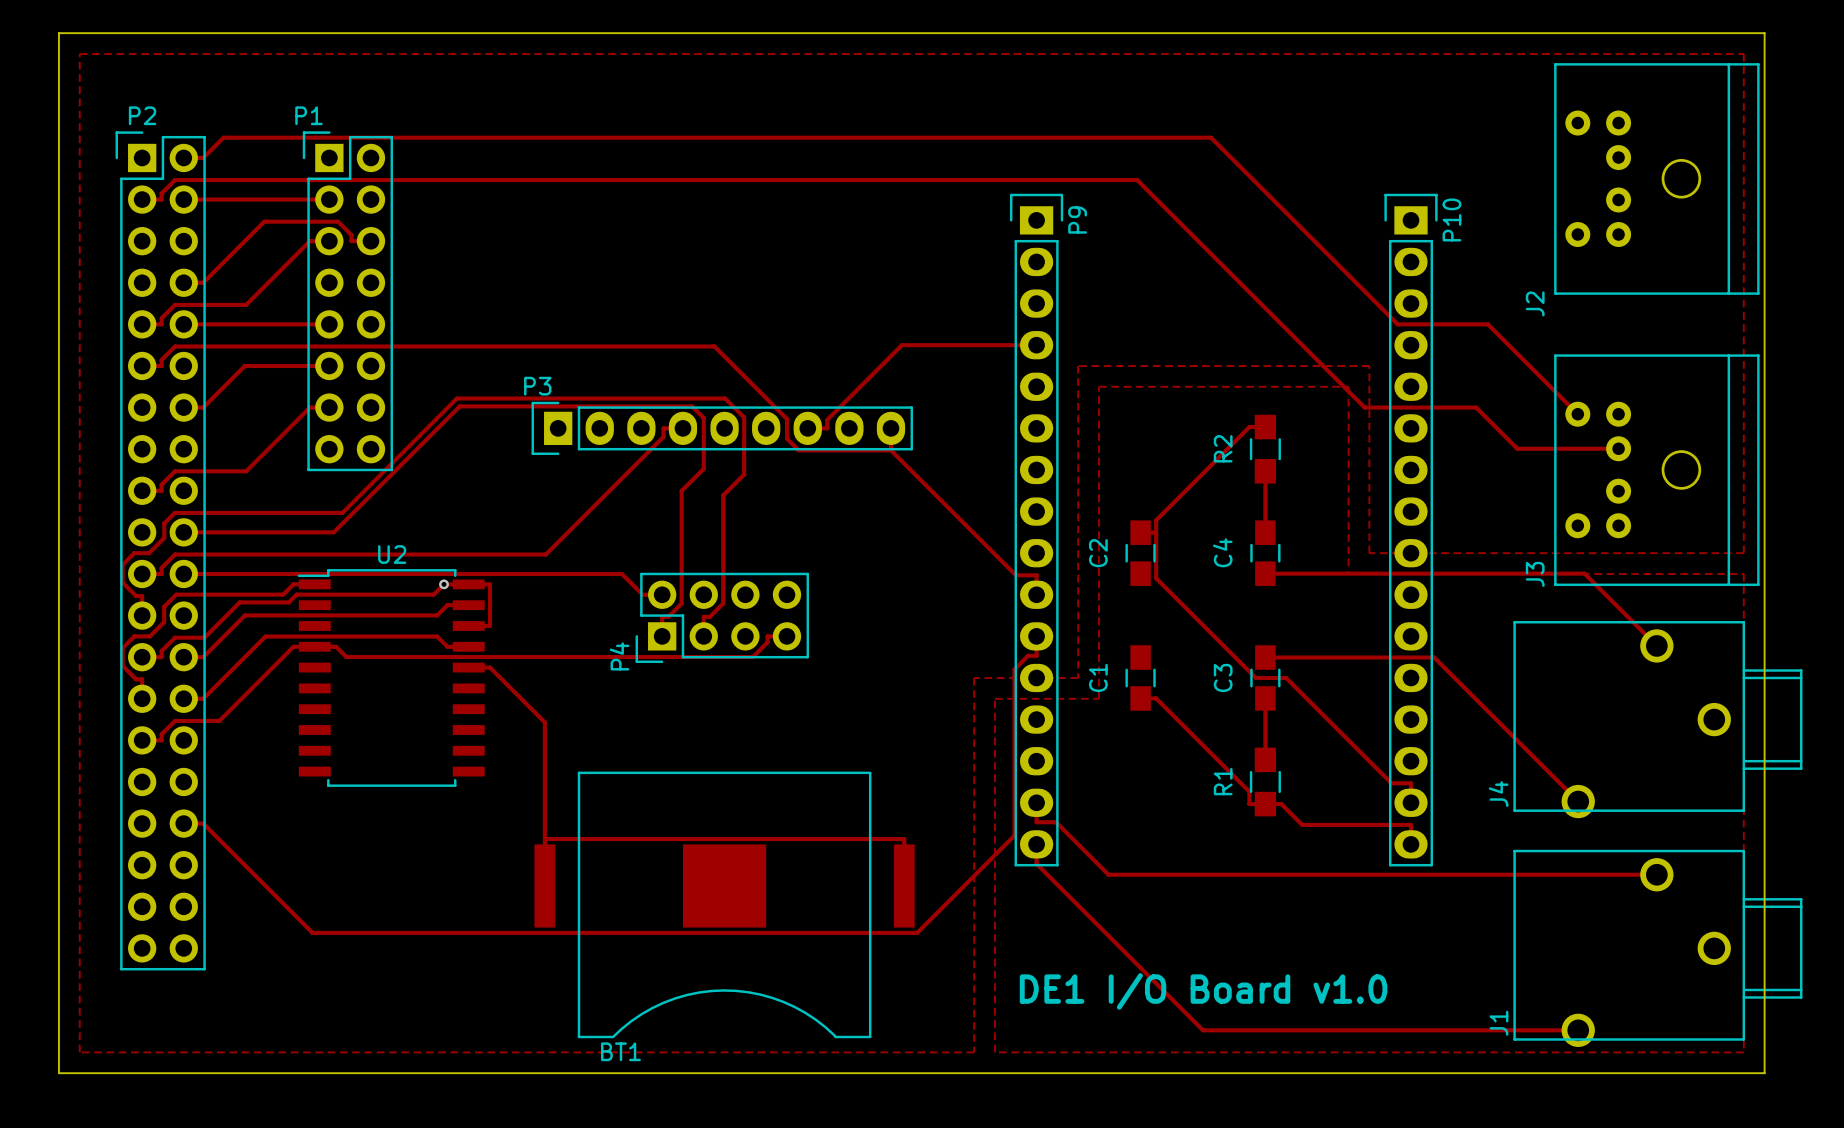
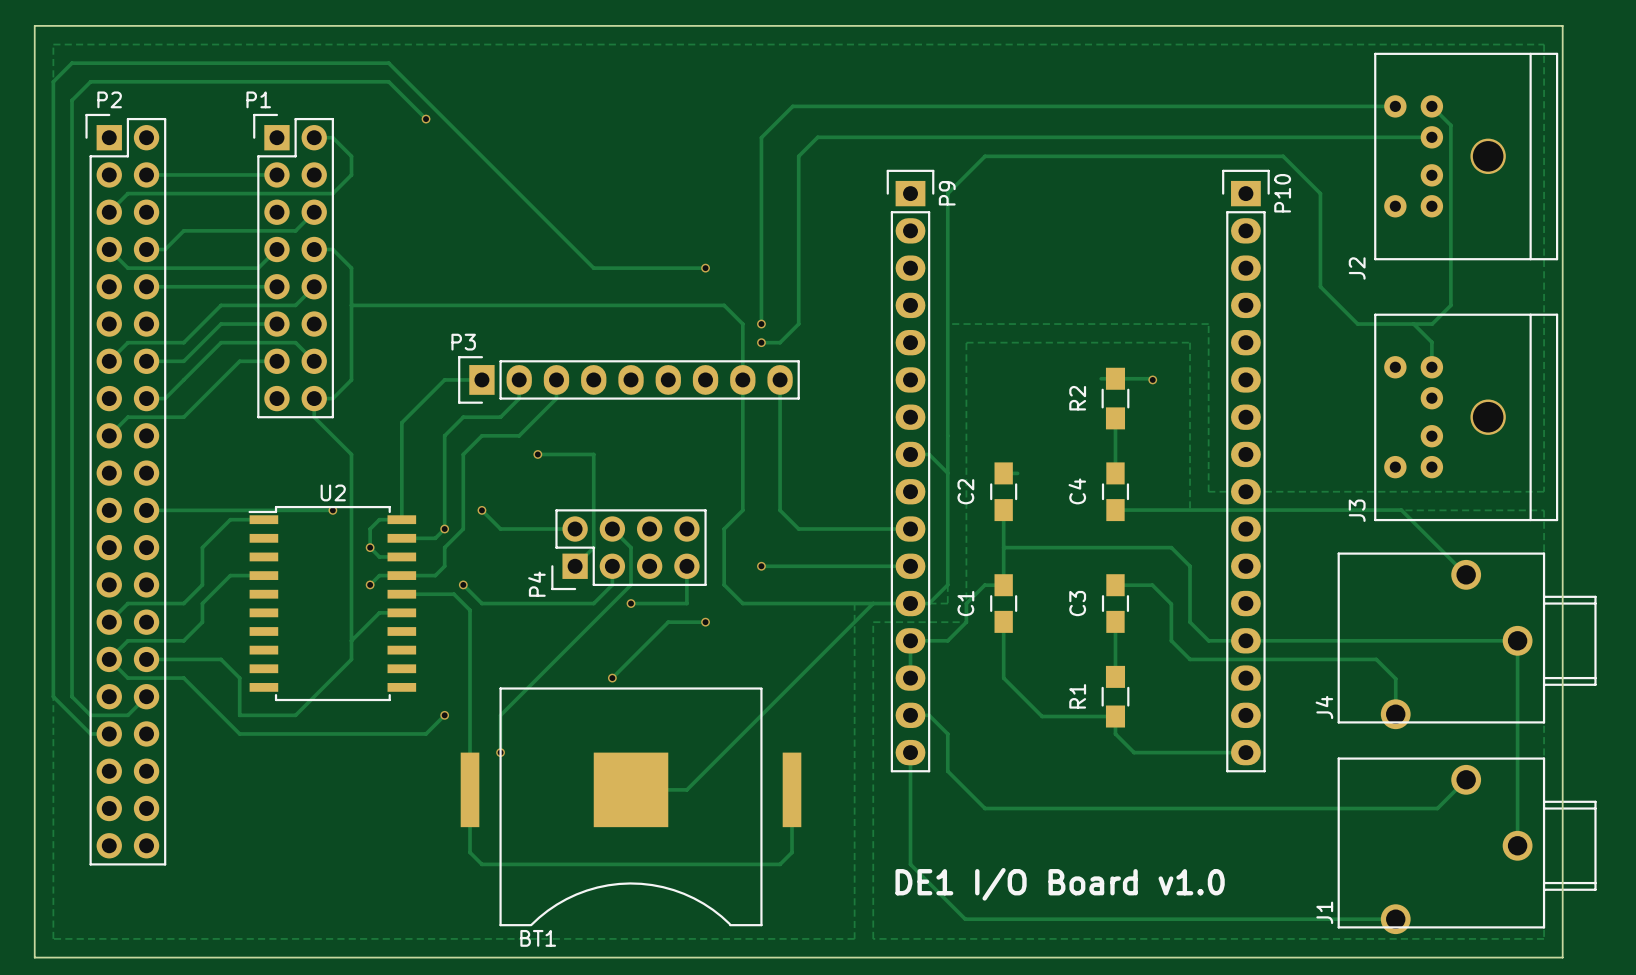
track: none -> (1395, 106) (792, 106) (761, 137) (761, 324)
track: none -> (1431, 106) (1450, 125) (1450, 305) (1432, 324) (1357, 324) (1320, 286) (1320, 193) (1283, 156) (985, 156) (947, 193) (947, 584) (929, 603) (742, 603) (724, 584) (724, 529) (742, 510) (742, 324) (724, 305) (351, 305)
track: none -> (426, 119) (388, 81) (90, 81) (72, 100) (72, 696) (90, 715) (127, 715) (146, 696)
via: none -> (426, 119)
track: (183, 157) (203, 157) (223, 137) (1211, 137) (1397, 324) (1487, 324) (1577, 414) -> none
track: none -> (314, 137) (332, 137) (351, 156) (351, 174) (332, 193) (127, 193) (109, 212)
track: none -> (1431, 137) (817, 137) (798, 156) (798, 324) (780, 342) (761, 342)
track: (142, 199) (161, 199) (161, 193) (175, 180) (1137, 180) (1364, 407) (1476, 407) (1517, 448) (1618, 448) -> none
track: (329, 241) (309, 241) (246, 304) (175, 304) (161, 318) (161, 324) (142, 324) -> none
track: (370, 241) (351, 241) (351, 235) (338, 221) (264, 221) (203, 282) -> (314, 212) (295, 230) (183, 230) (163, 249)
track: none -> (109, 249) (127, 268) (258, 268) (276, 249)
track: none -> (314, 249) (332, 249) (351, 268) (351, 379) (332, 398) (314, 398) (314, 417) (351, 454) (351, 659) (295, 715) (239, 715) (239, 678) (221, 659) (146, 659)
track: none -> (705, 268) (593, 268) (388, 63) (72, 63) (53, 81) (53, 696) (90, 733) (109, 733)
via: none -> (705, 268)
track: none -> (314, 286) (295, 305) (221, 305) (183, 342) (127, 342) (109, 361)
track: (1036, 345) (901, 345) (827, 419) (827, 428) (807, 428) -> none
track: (142, 365) (161, 365) (161, 359) (175, 346) (714, 346) (786, 419) (786, 438) (798, 450) (890, 450) (1015, 575) (1036, 575) (1036, 594) -> (780, 399) (780, 510) (798, 529) (910, 529)
track: (266, 365) (244, 365) (203, 407) -> (221, 324) (183, 361) (163, 361)
via: none -> (761, 324)
track: none -> (1413, 324) (1431, 342) (1431, 367)
via: none -> (761, 342)
track: (309, 407) (246, 471) (175, 471) (161, 484) (161, 490) (142, 490) -> (259, 361) (239, 361) (183, 417) (127, 417) (109, 435)
track: none -> (314, 361) (295, 342) (221, 342) (165, 398) (146, 398)
track: (1249, 427) (1156, 520) (1156, 578) (1255, 677) (1286, 677) (1327, 719) -> (1152, 585) (1171, 604) (1171, 640)
track: none -> (1115, 378) (1152, 379)
track: none -> (481, 379) (444, 379) (401, 422) (401, 519)
track: none -> (556, 379) (556, 398) (519, 435) (481, 435) (463, 454) (463, 529) (444, 547) (444, 566) (435, 575) (401, 575)
track: (682, 428) (663, 428) (663, 436) (545, 554) (175, 554) (161, 567) (161, 573) (142, 573) -> none
via: none -> (1152, 379)
via: none -> (537, 454)
track: none -> (910, 454) (929, 454) (947, 473)
track: (183, 532) (333, 532) (459, 406) (692, 406) (703, 418) (703, 468) (681, 490) (681, 603) (668, 616) (662, 616) (662, 636) -> (537, 454) (593, 454) (593, 547) (575, 566)
track: (391, 573) (621, 573) (642, 594) -> (481, 510) (500, 529) (557, 529)
via: none -> (332, 510)
via: none -> (481, 510)
track: none -> (1003, 510) (1003, 585) (984, 585) (966, 603) (966, 622) (947, 640) (910, 640) (910, 678)
track: (293, 584) (283, 594) (176, 594) (164, 606) (164, 622) (149, 636) (134, 636) (122, 648) (122, 665) (136, 679) (142, 679) (142, 698) -> (244, 519) (230, 519) (202, 547) (202, 584) (183, 603) (127, 603) (109, 622)
track: (444, 584) (433, 594) (296, 594) (288, 602) (239, 602) (204, 637) (175, 637) (161, 651) (161, 657) (142, 657) -> none
via: (444, 584) -> none
track: (468, 584) (490, 584) (490, 625) (468, 625) -> (379, 519) (370, 529) (370, 547) (379, 556) (401, 556)
via: none -> (444, 529)
track: none -> (612, 529) (631, 547) (631, 584) (500, 715) (500, 752)
track: (468, 605) (447, 605) (437, 615) (244, 615) (203, 657) (183, 657) -> (401, 538) (435, 538) (444, 529) (444, 435) (463, 417) (500, 417) (519, 398) (519, 379)
track: (142, 615) (142, 596) (136, 596) (122, 582) (122, 564) (134, 553) (149, 553) (164, 537) (164, 523) (174, 512) (342, 512) (456, 398) (725, 398) (744, 417) (744, 474) (723, 495) (723, 603) (709, 616) (703, 616) (703, 636) -> (463, 584) (481, 603) (593, 603) (612, 584) (612, 566)
via: none -> (370, 547)
track: none -> (1003, 547) (1171, 547) (1190, 566) (1190, 622) (1208, 640) (1517, 640) (1517, 845)
track: (786, 636) (767, 636) (767, 642) (752, 657) (346, 657) (336, 646) (314, 646) -> (686, 566) (686, 603) (631, 603)
via: none -> (761, 566)
track: (1036, 636) (1036, 655) (1028, 655) (1014, 669) (1014, 835) (917, 932) (312, 932) (203, 823) (183, 823) -> (910, 566) (761, 566)
track: (293, 646) (219, 720) (175, 720) (161, 734) (161, 740) (142, 740) -> (244, 575) (230, 575) (202, 603) (202, 622) (183, 640) (127, 640) (109, 659) (127, 678) (183, 678) (239, 733) (426, 733) (444, 715)
track: (447, 646) (437, 636) (265, 636) (203, 698) (183, 698) -> (382, 575) (379, 575) (370, 584)
via: none -> (370, 584)
via: none -> (463, 584)
track: (1306, 657) (1434, 657) (1578, 801) -> (1190, 659) (1376, 659) (1395, 678) (1395, 714)
track: (490, 667) (544, 722) -> (420, 594) (453, 594) (470, 610) (470, 643)
via: none -> (631, 603)
track: none -> (873, 603) (686, 789) (631, 789)
track: none -> (401, 612) (379, 612) (351, 640)
track: none -> (705, 622) (668, 622) (612, 678)
via: none -> (705, 622)
track: (1140, 698) (1156, 698) (1249, 791) (1249, 804) -> (1003, 621) (1003, 678) (1042, 716) (1101, 716)
track: (1348, 740) (1391, 783) (1410, 783) (1410, 802) -> none
via: none -> (612, 678)
via: none -> (444, 715)
track: (1036, 802) (1036, 822) (1056, 822) (1108, 874) (1656, 874) -> (910, 715) (929, 715) (947, 733) (947, 771) (985, 808) (1437, 808) (1466, 779)
track: (1265, 804) (1281, 804) (1302, 824) (1410, 824) (1410, 844) -> (1115, 716) (1115, 733) (1134, 752) (1245, 752)
track: (544, 839) (904, 839) (904, 885) -> (470, 789) (470, 852) (481, 864) (780, 864) (792, 852) (792, 789)
via: none -> (500, 752)
track: (1036, 863) (1203, 1030) -> (910, 770) (910, 864) (965, 919) (1059, 919)

